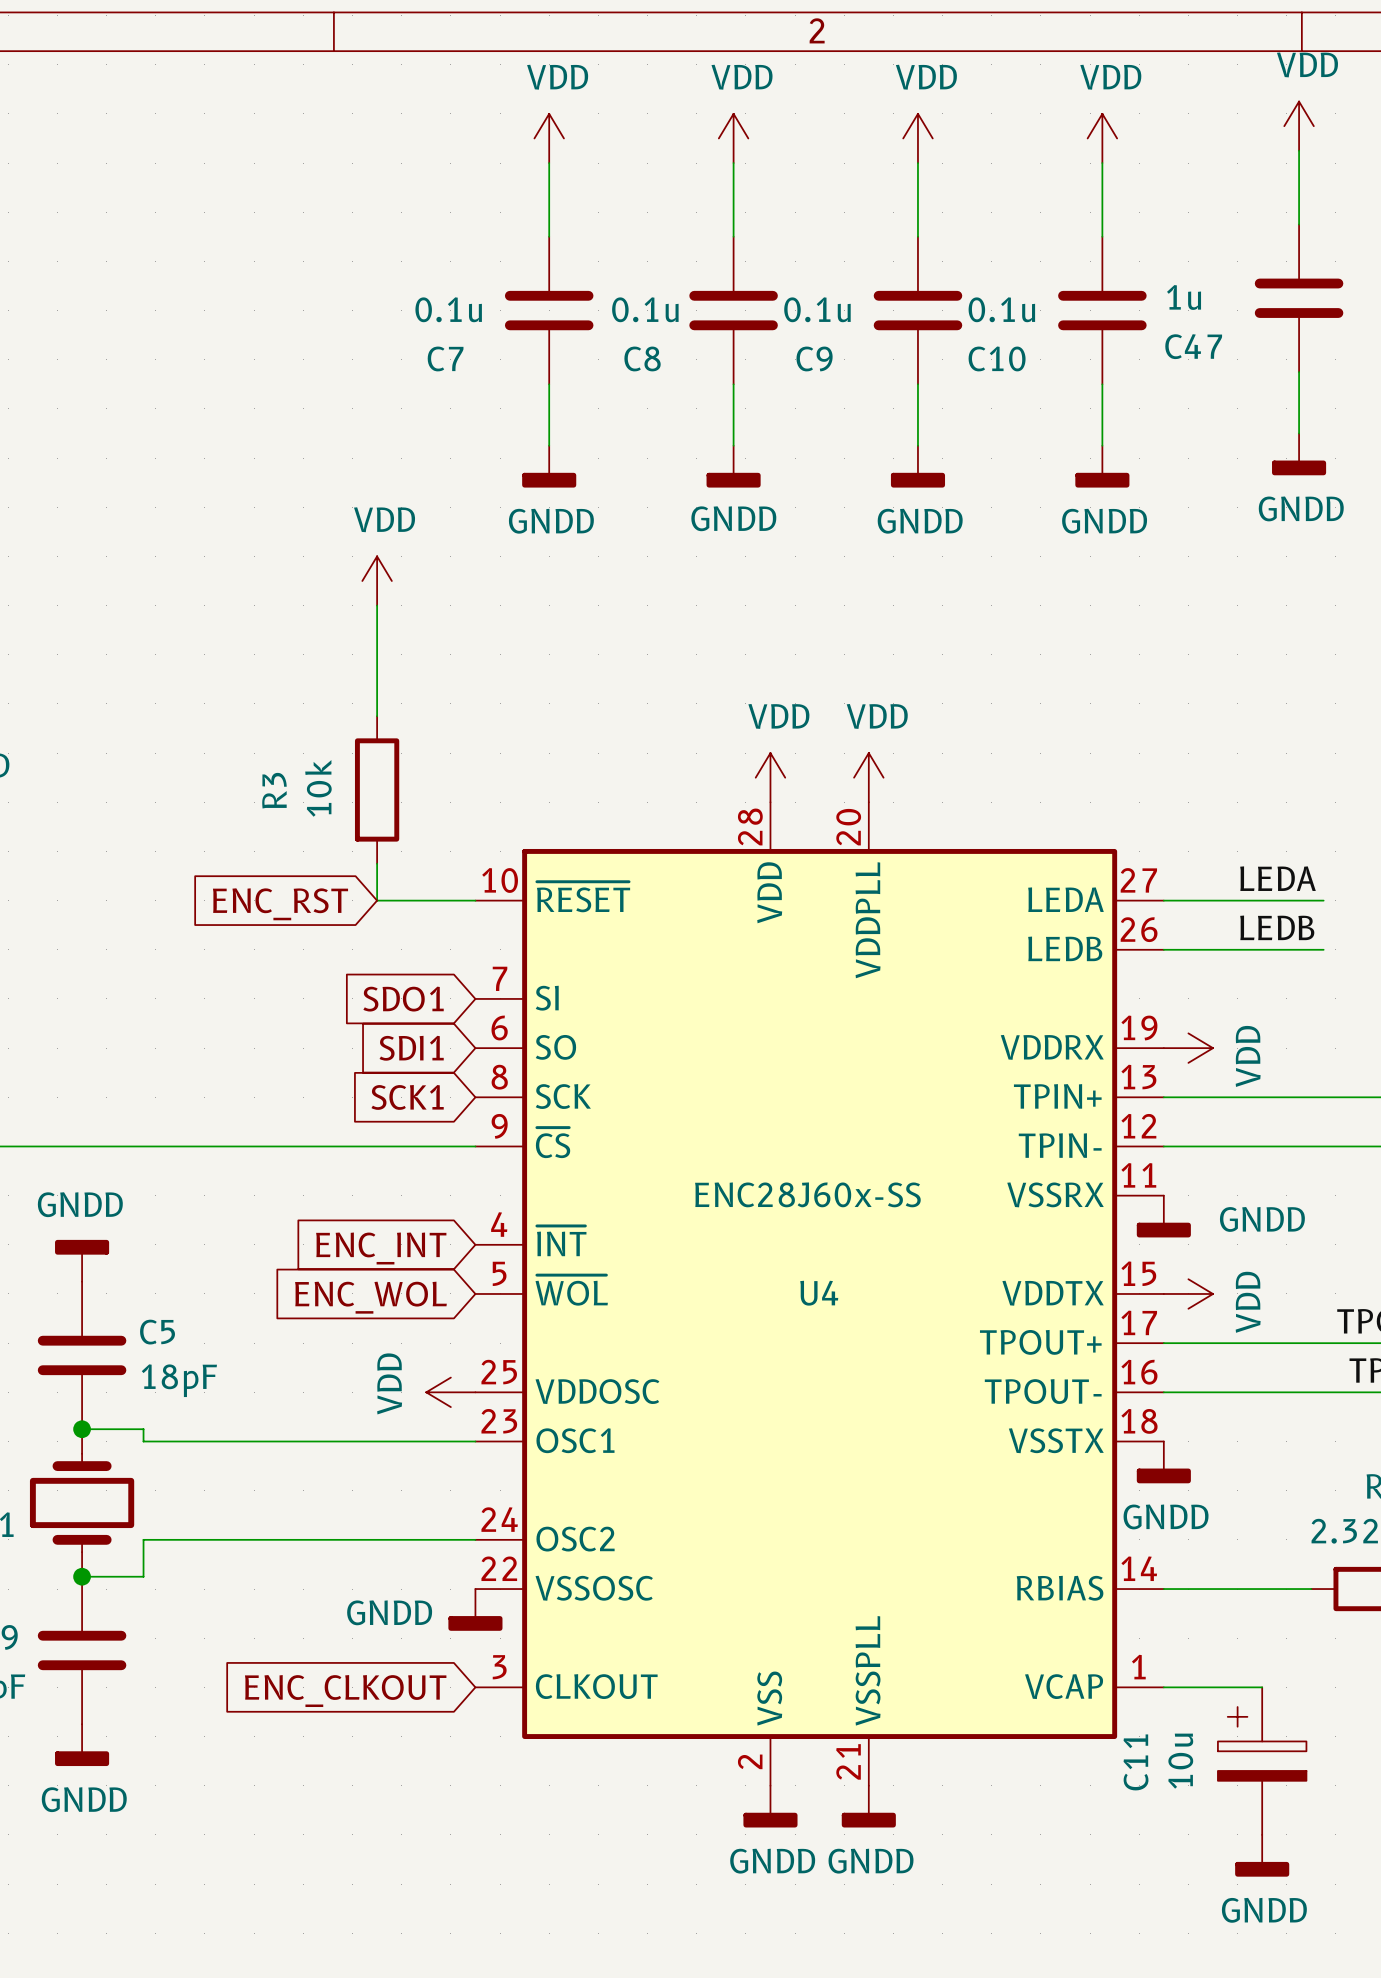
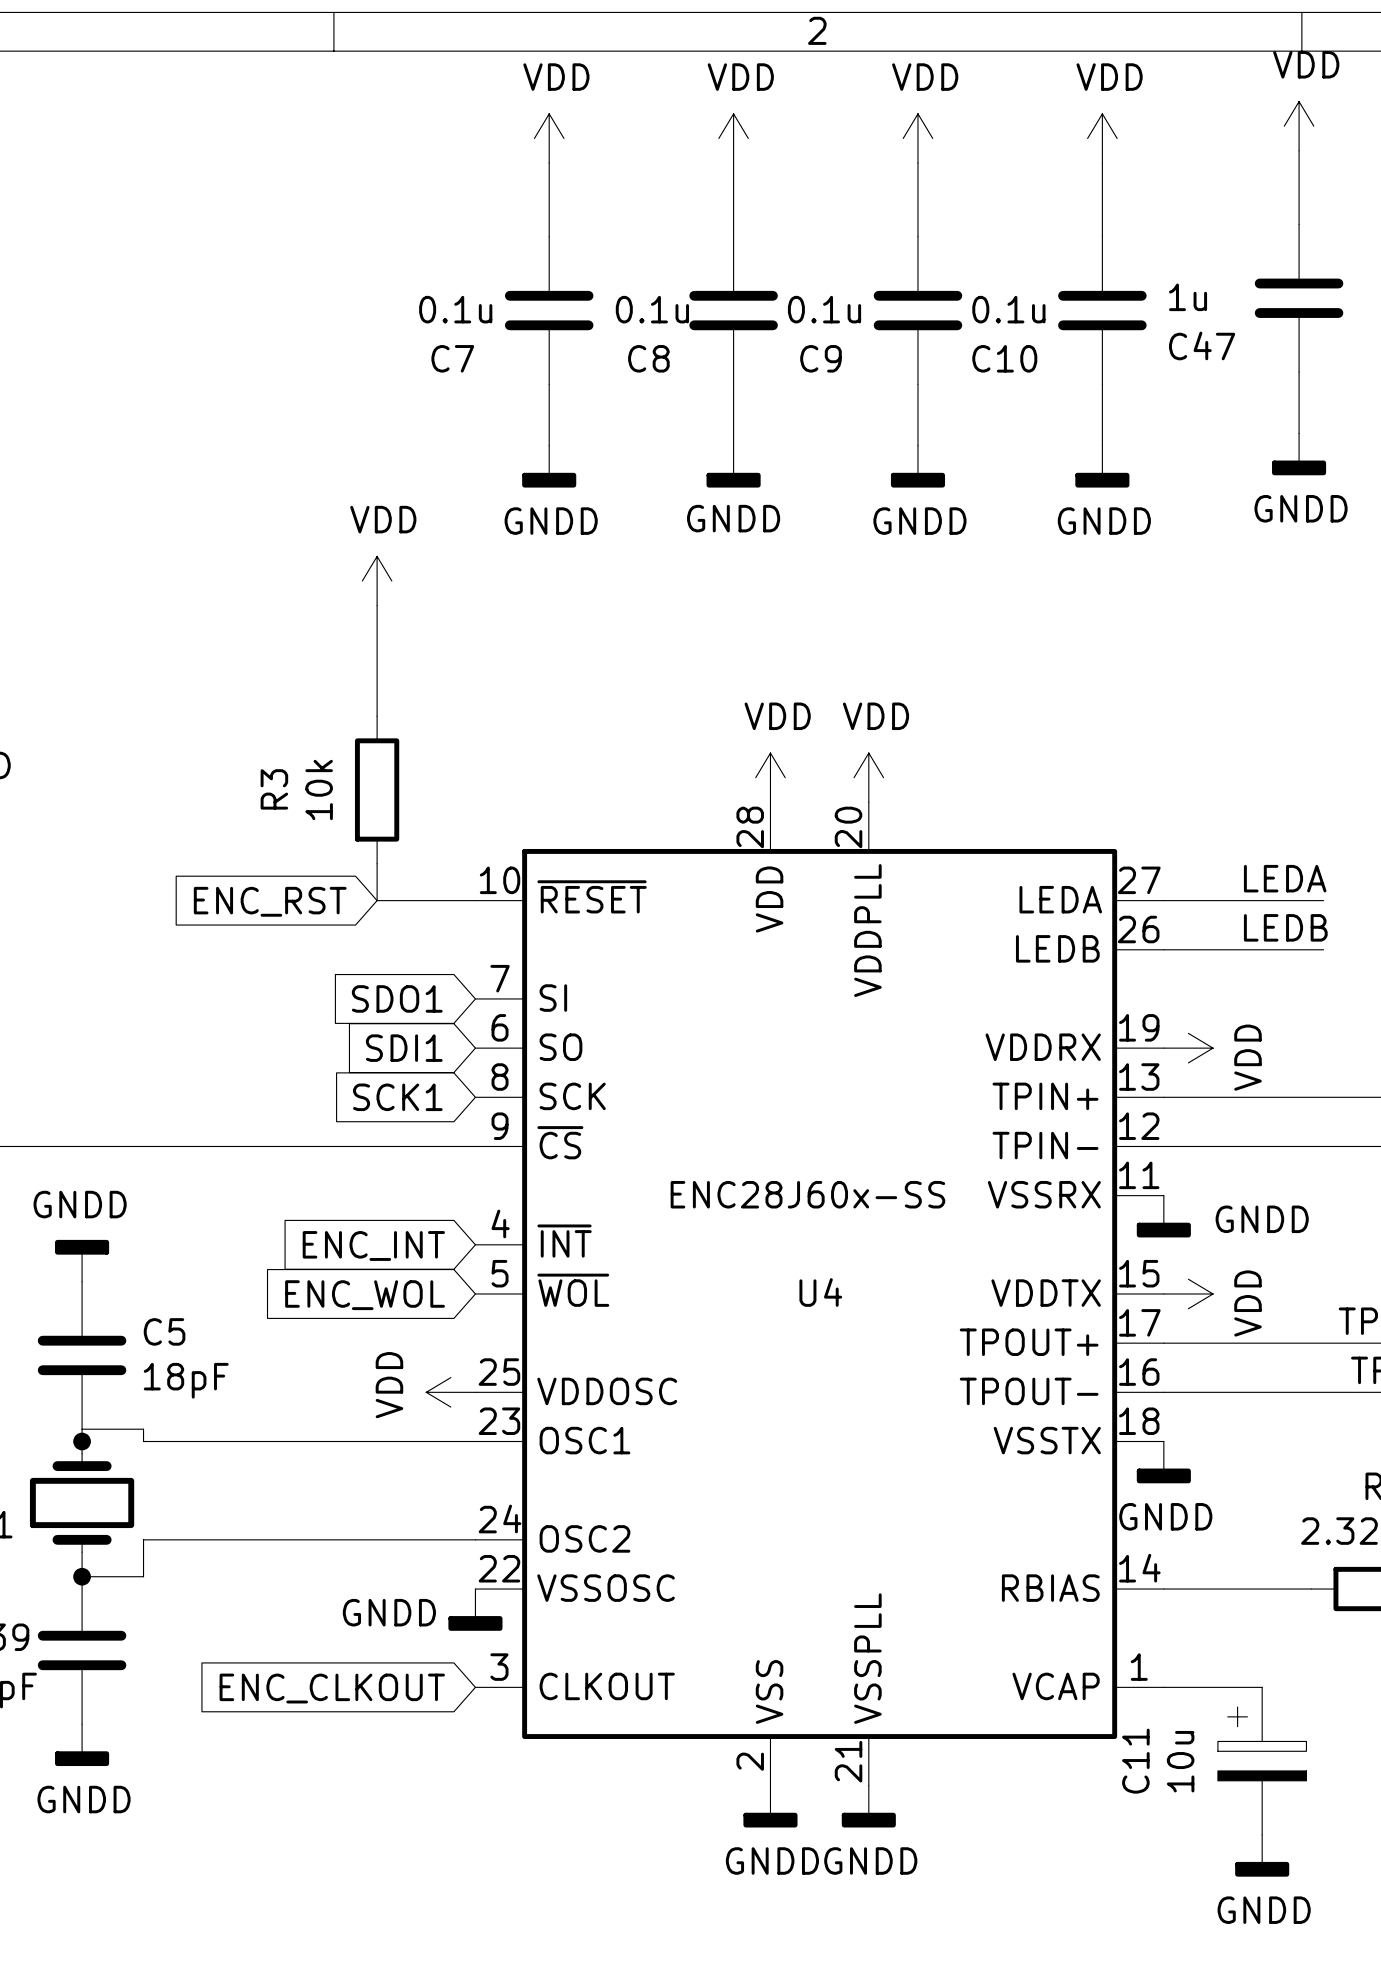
junction position: (82, 1429) -> (82, 1441)

